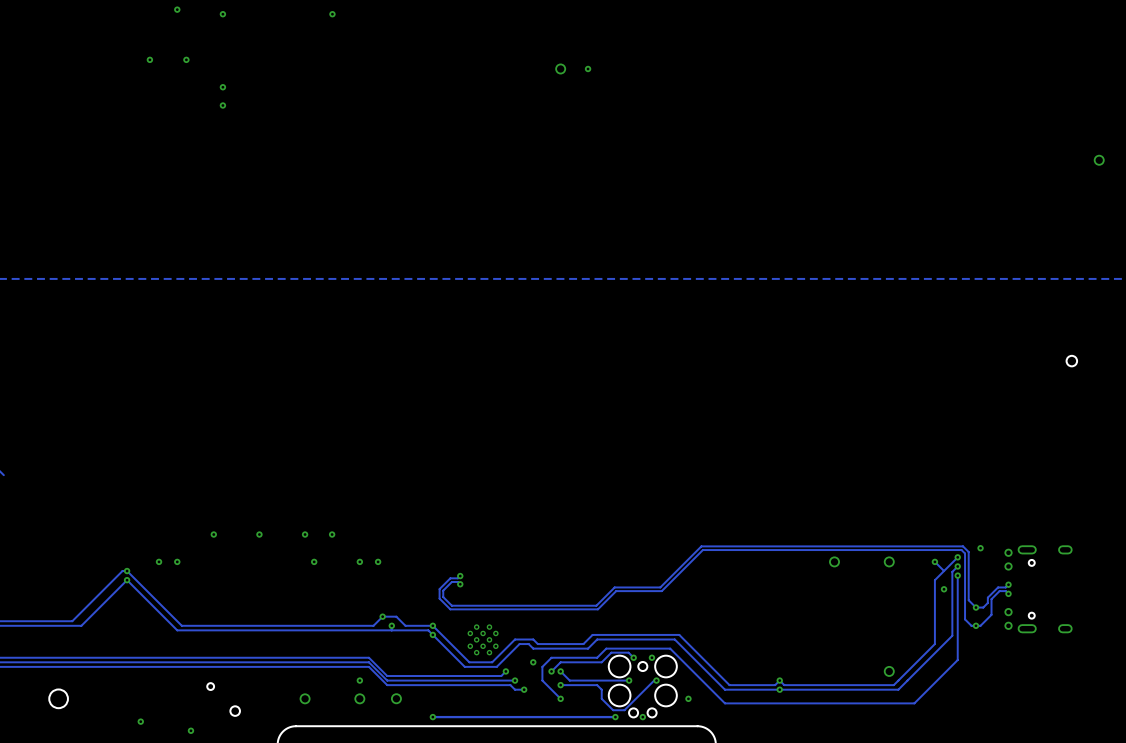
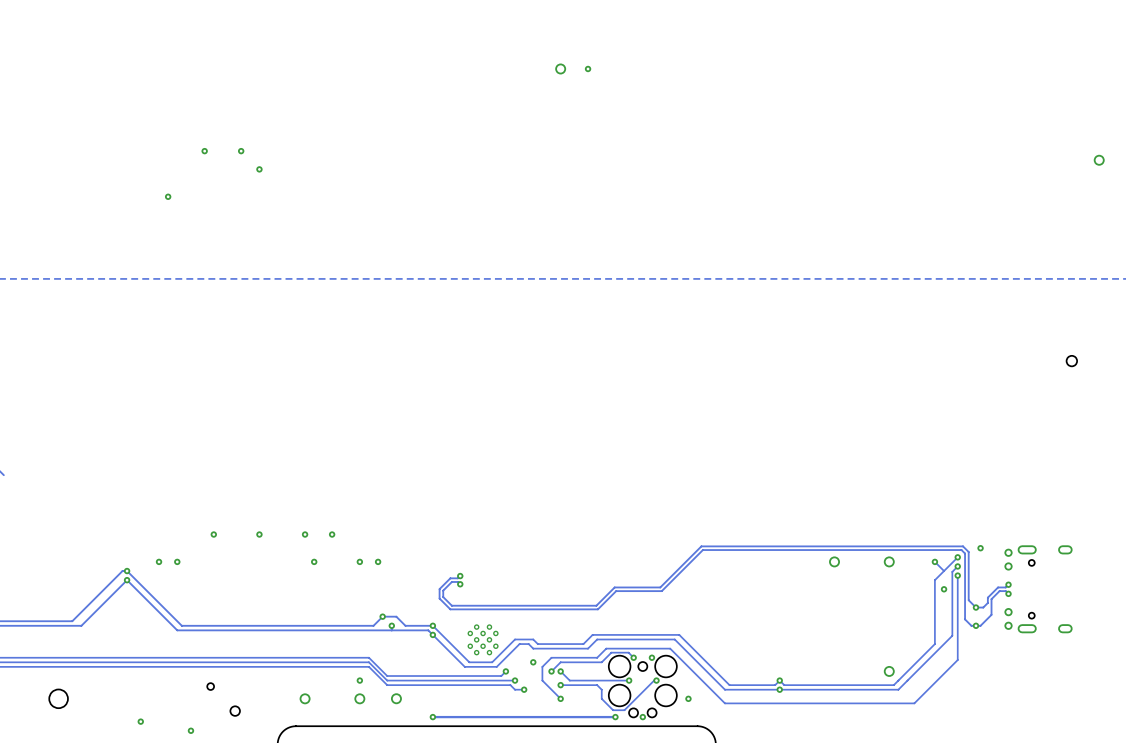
via: (177, 9) -> none
via: (222, 14) -> none
via: (332, 14) -> none
via: (149, 59) -> none
via: (186, 59) -> none
via: (222, 87) -> none
via: (222, 105) -> none
via: none -> (204, 151)
via: none -> (241, 151)
via: none -> (259, 169)
via: none -> (168, 196)

